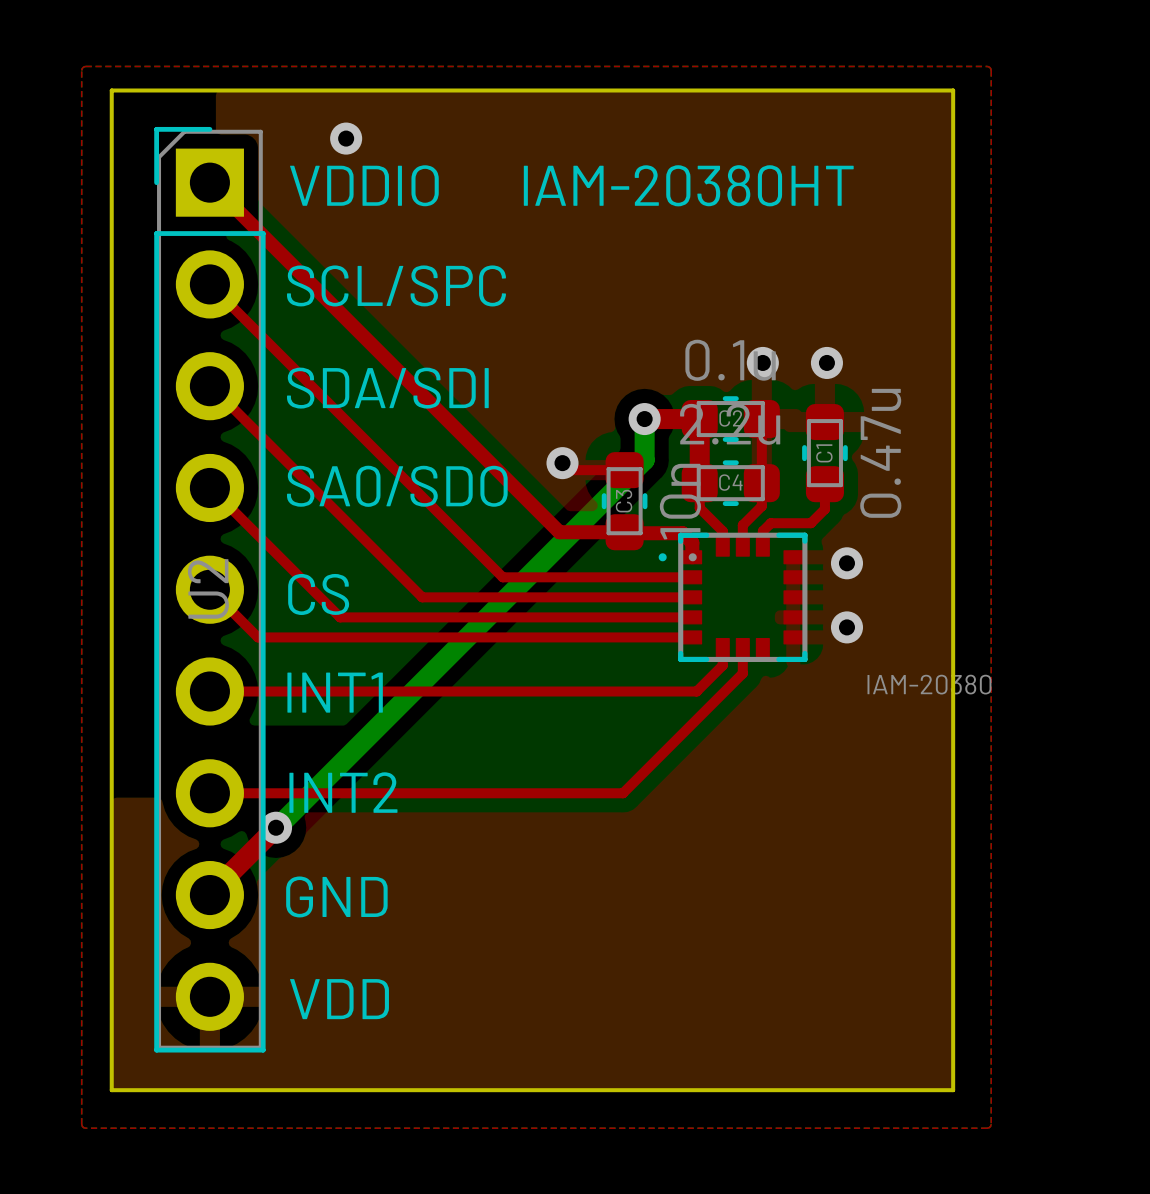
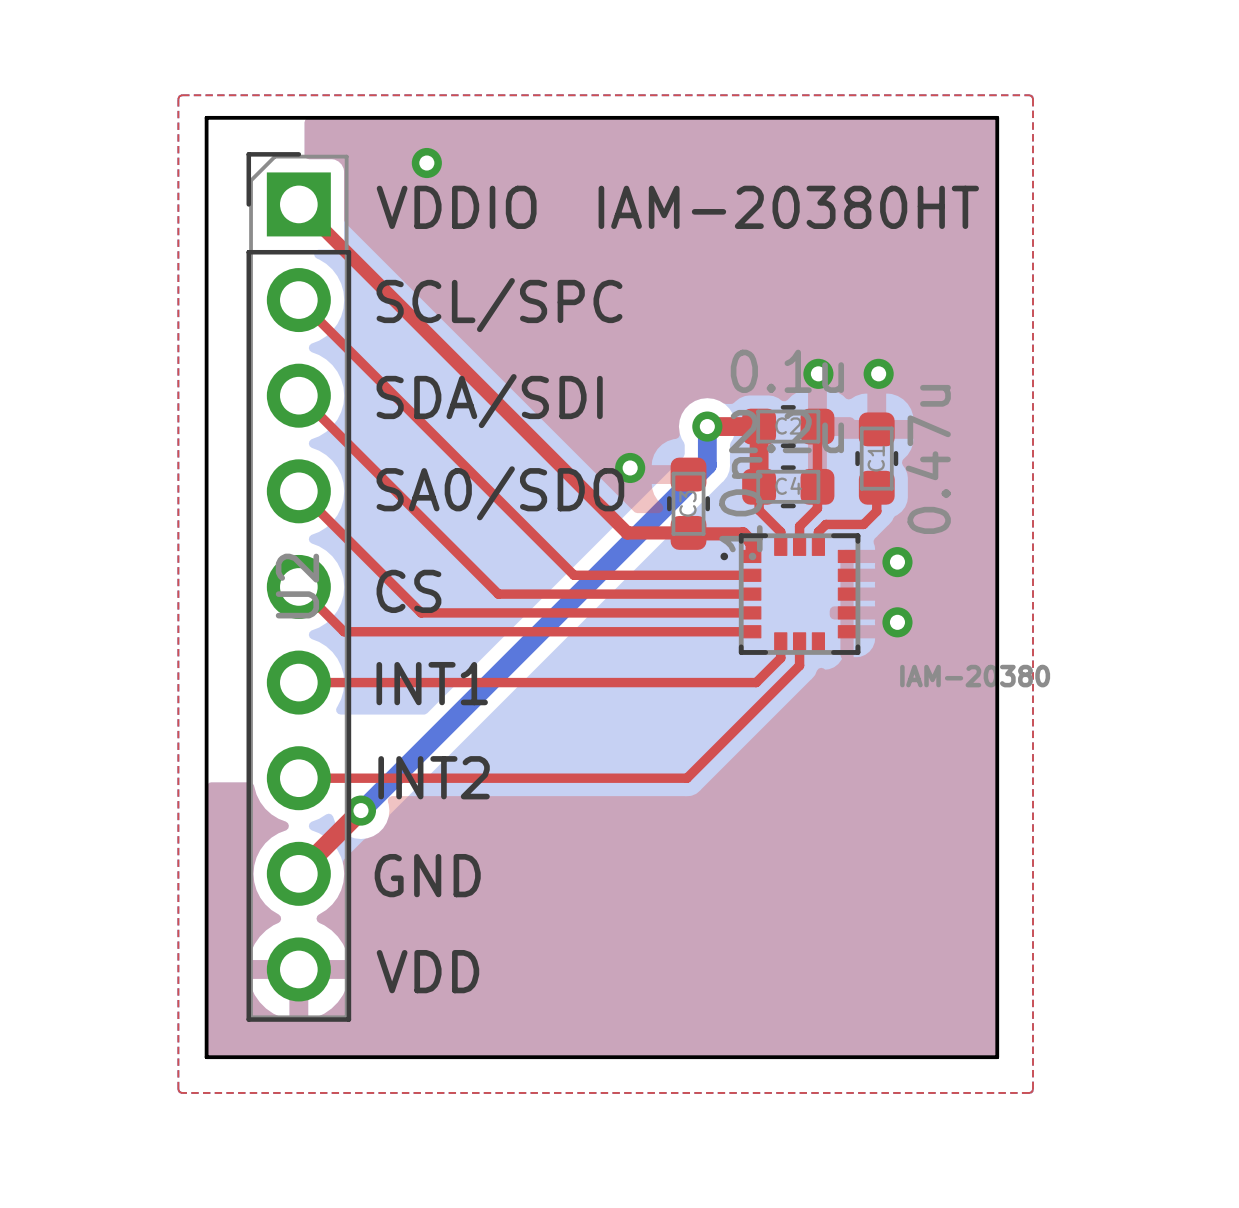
top track: (562, 463) (569, 470) (624, 470) -> none

